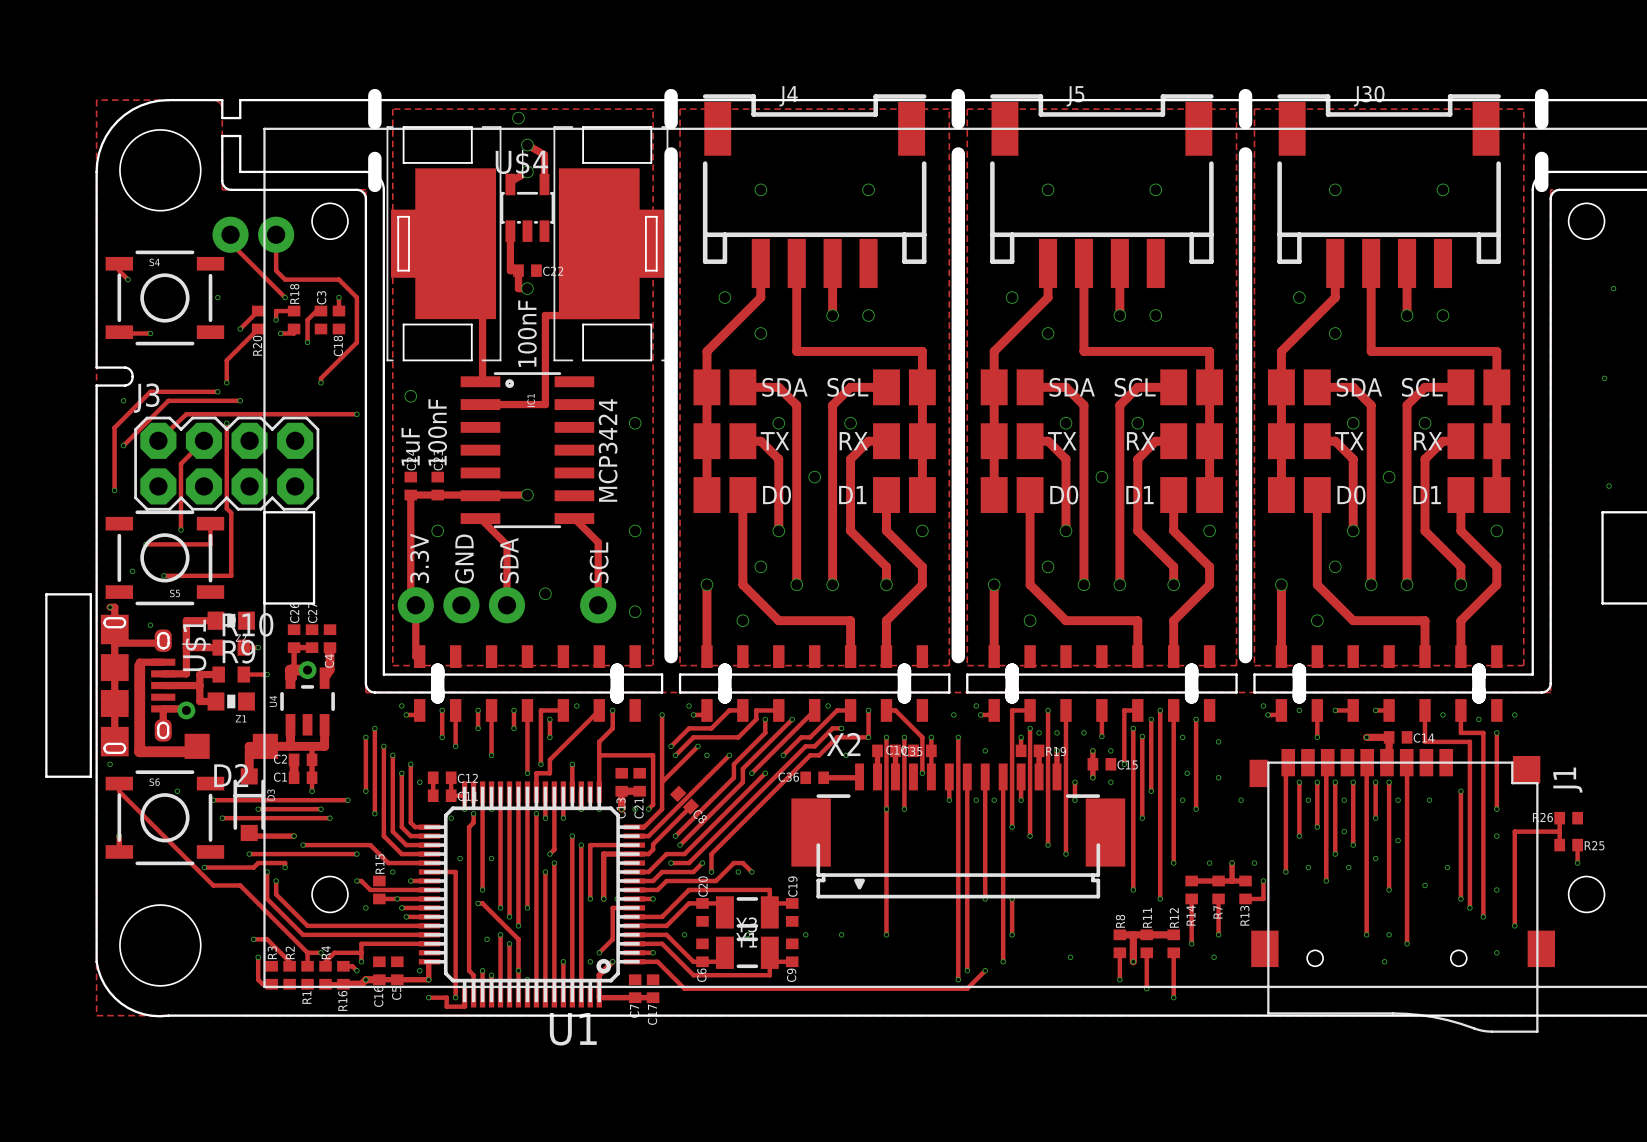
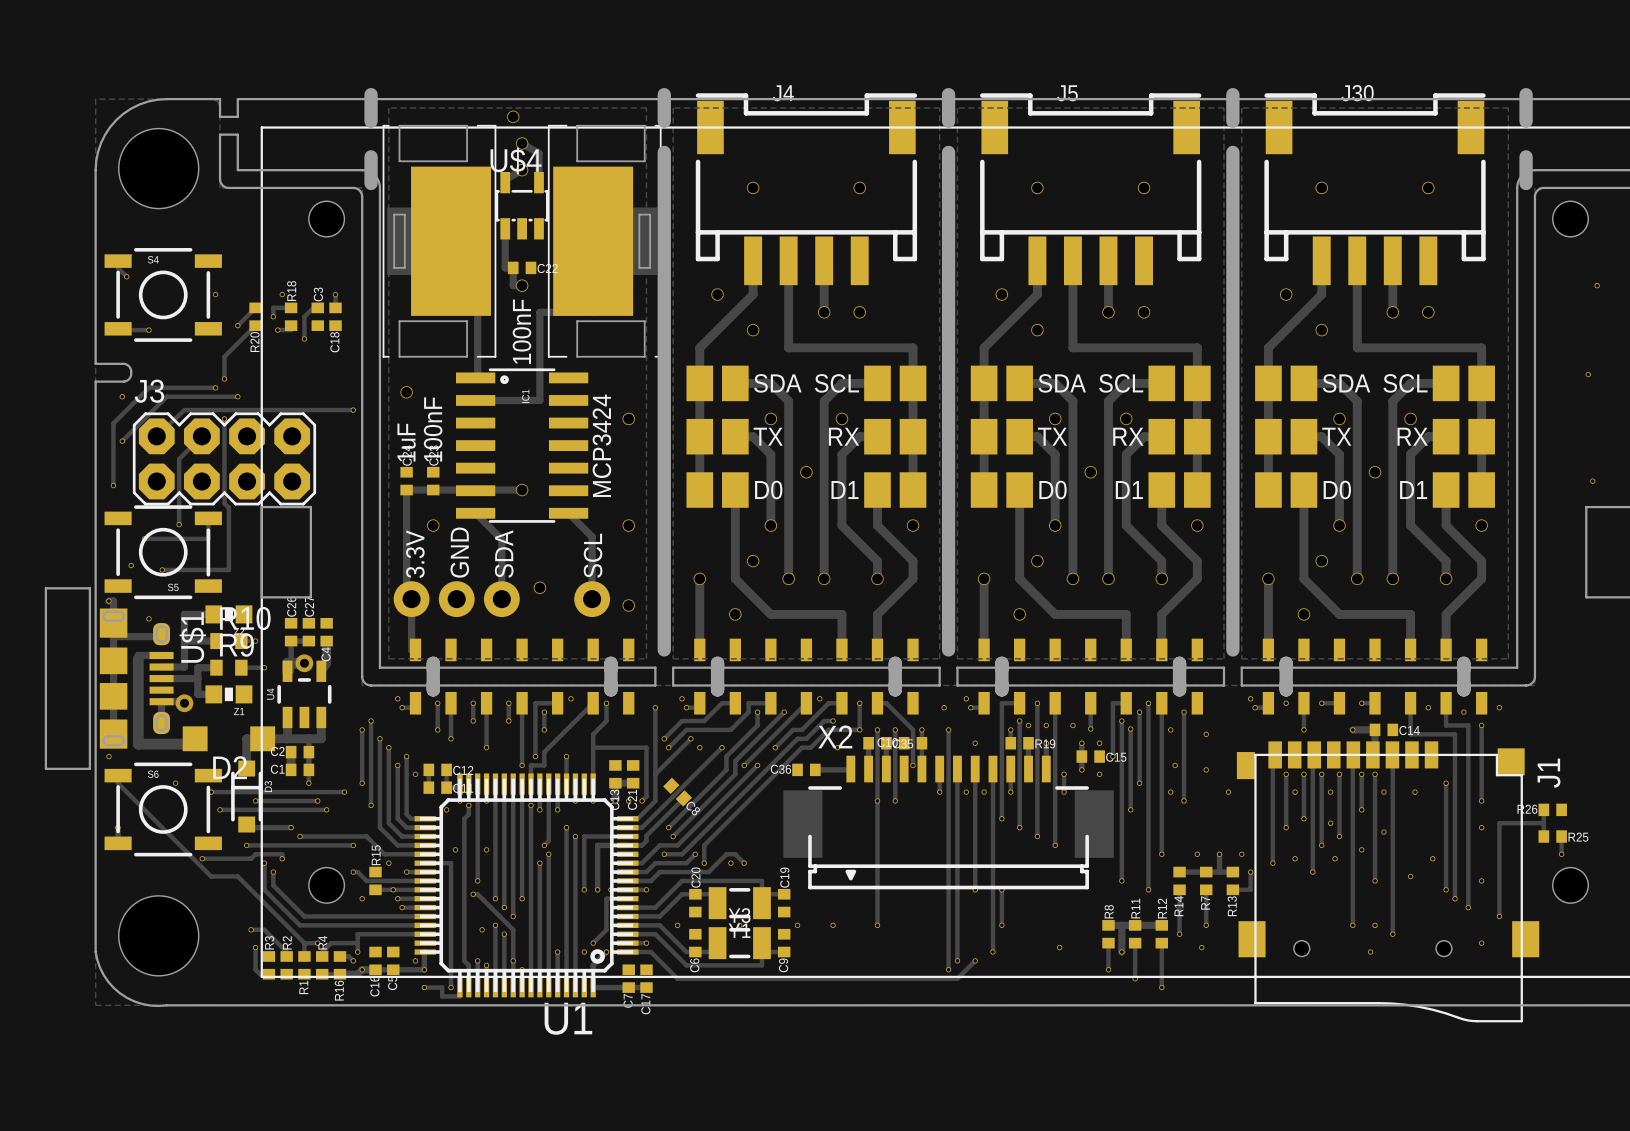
track: (230, 234) (231, 243) (285, 297) -> none
part: (253, 234) -> none
track: (276, 234) (276, 270) (285, 279) (338, 279) (356, 297) (356, 342) (321, 378) (321, 382) -> none
via: (321, 382) -> none

